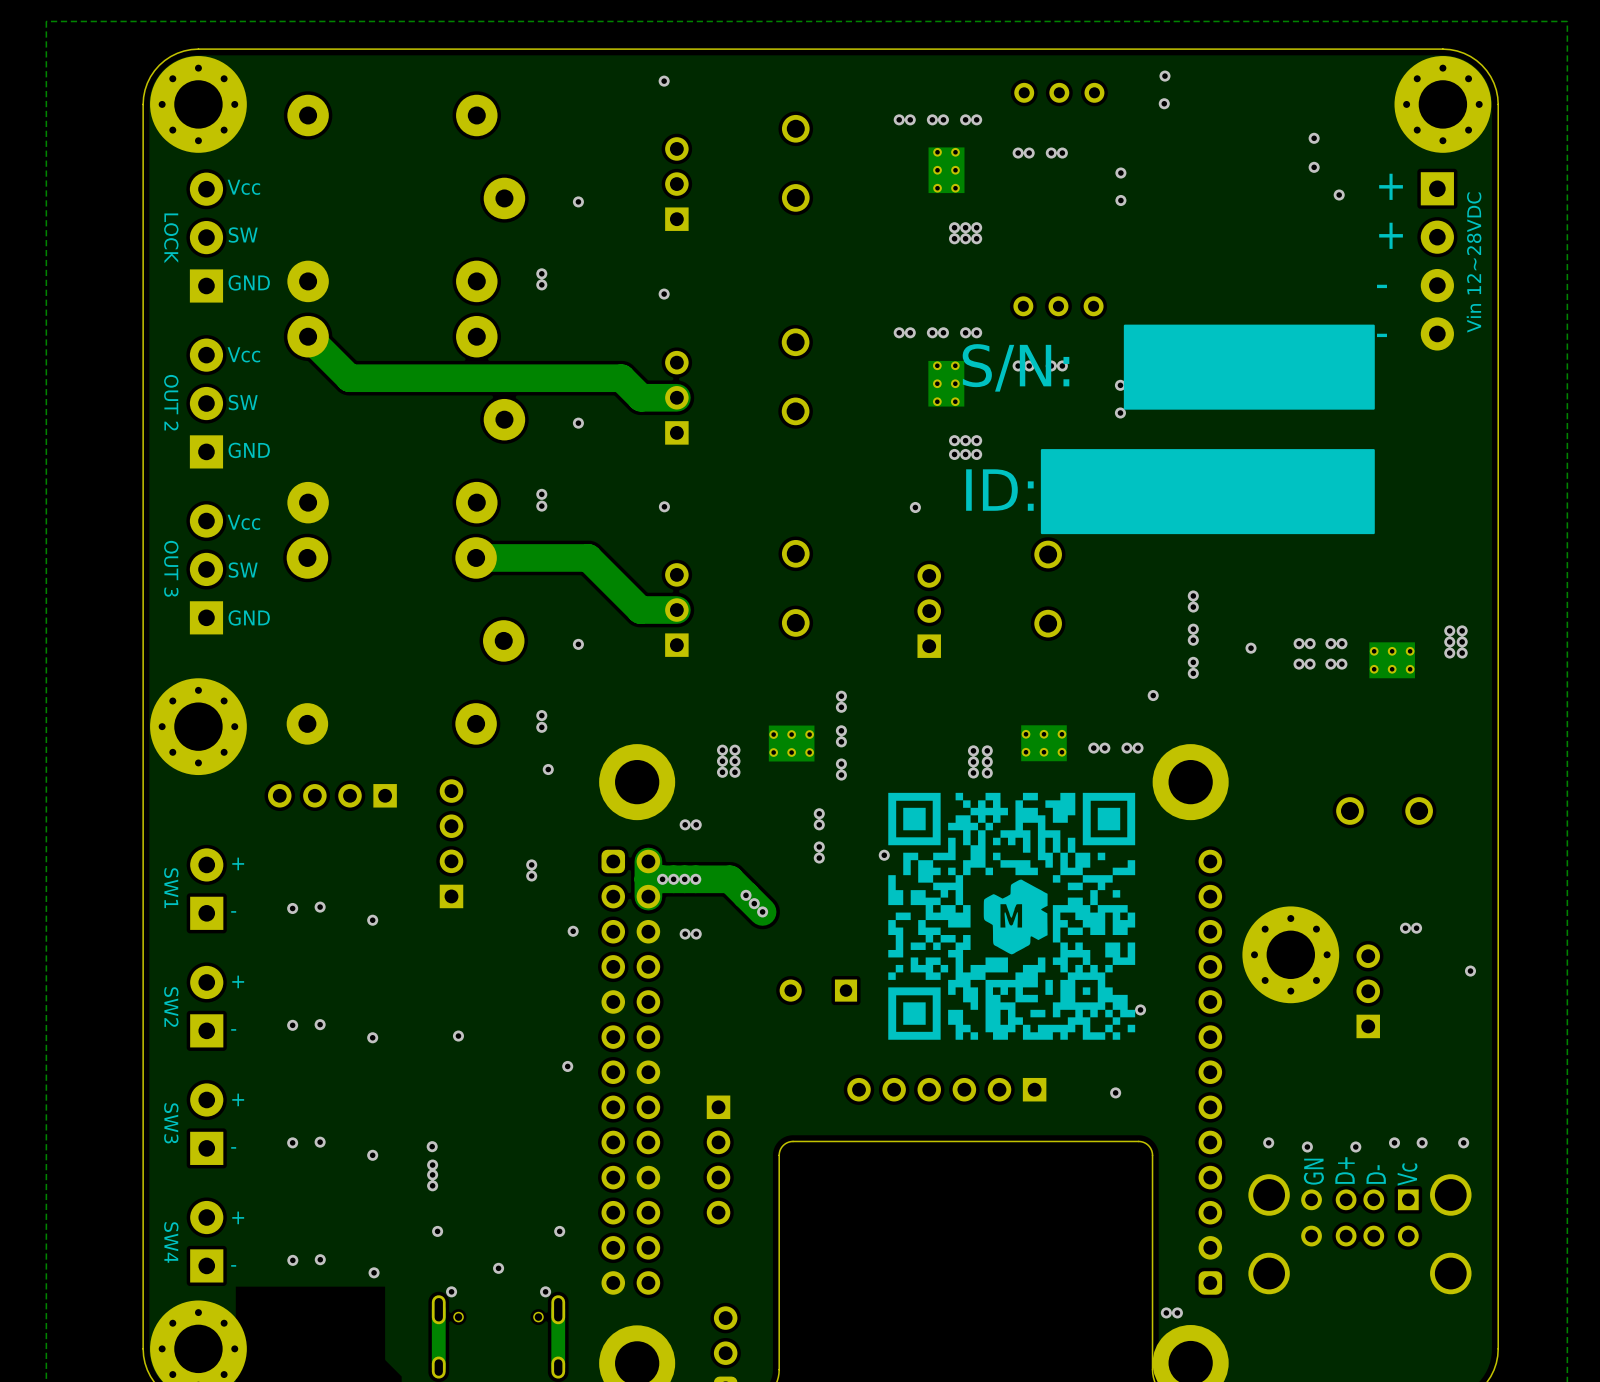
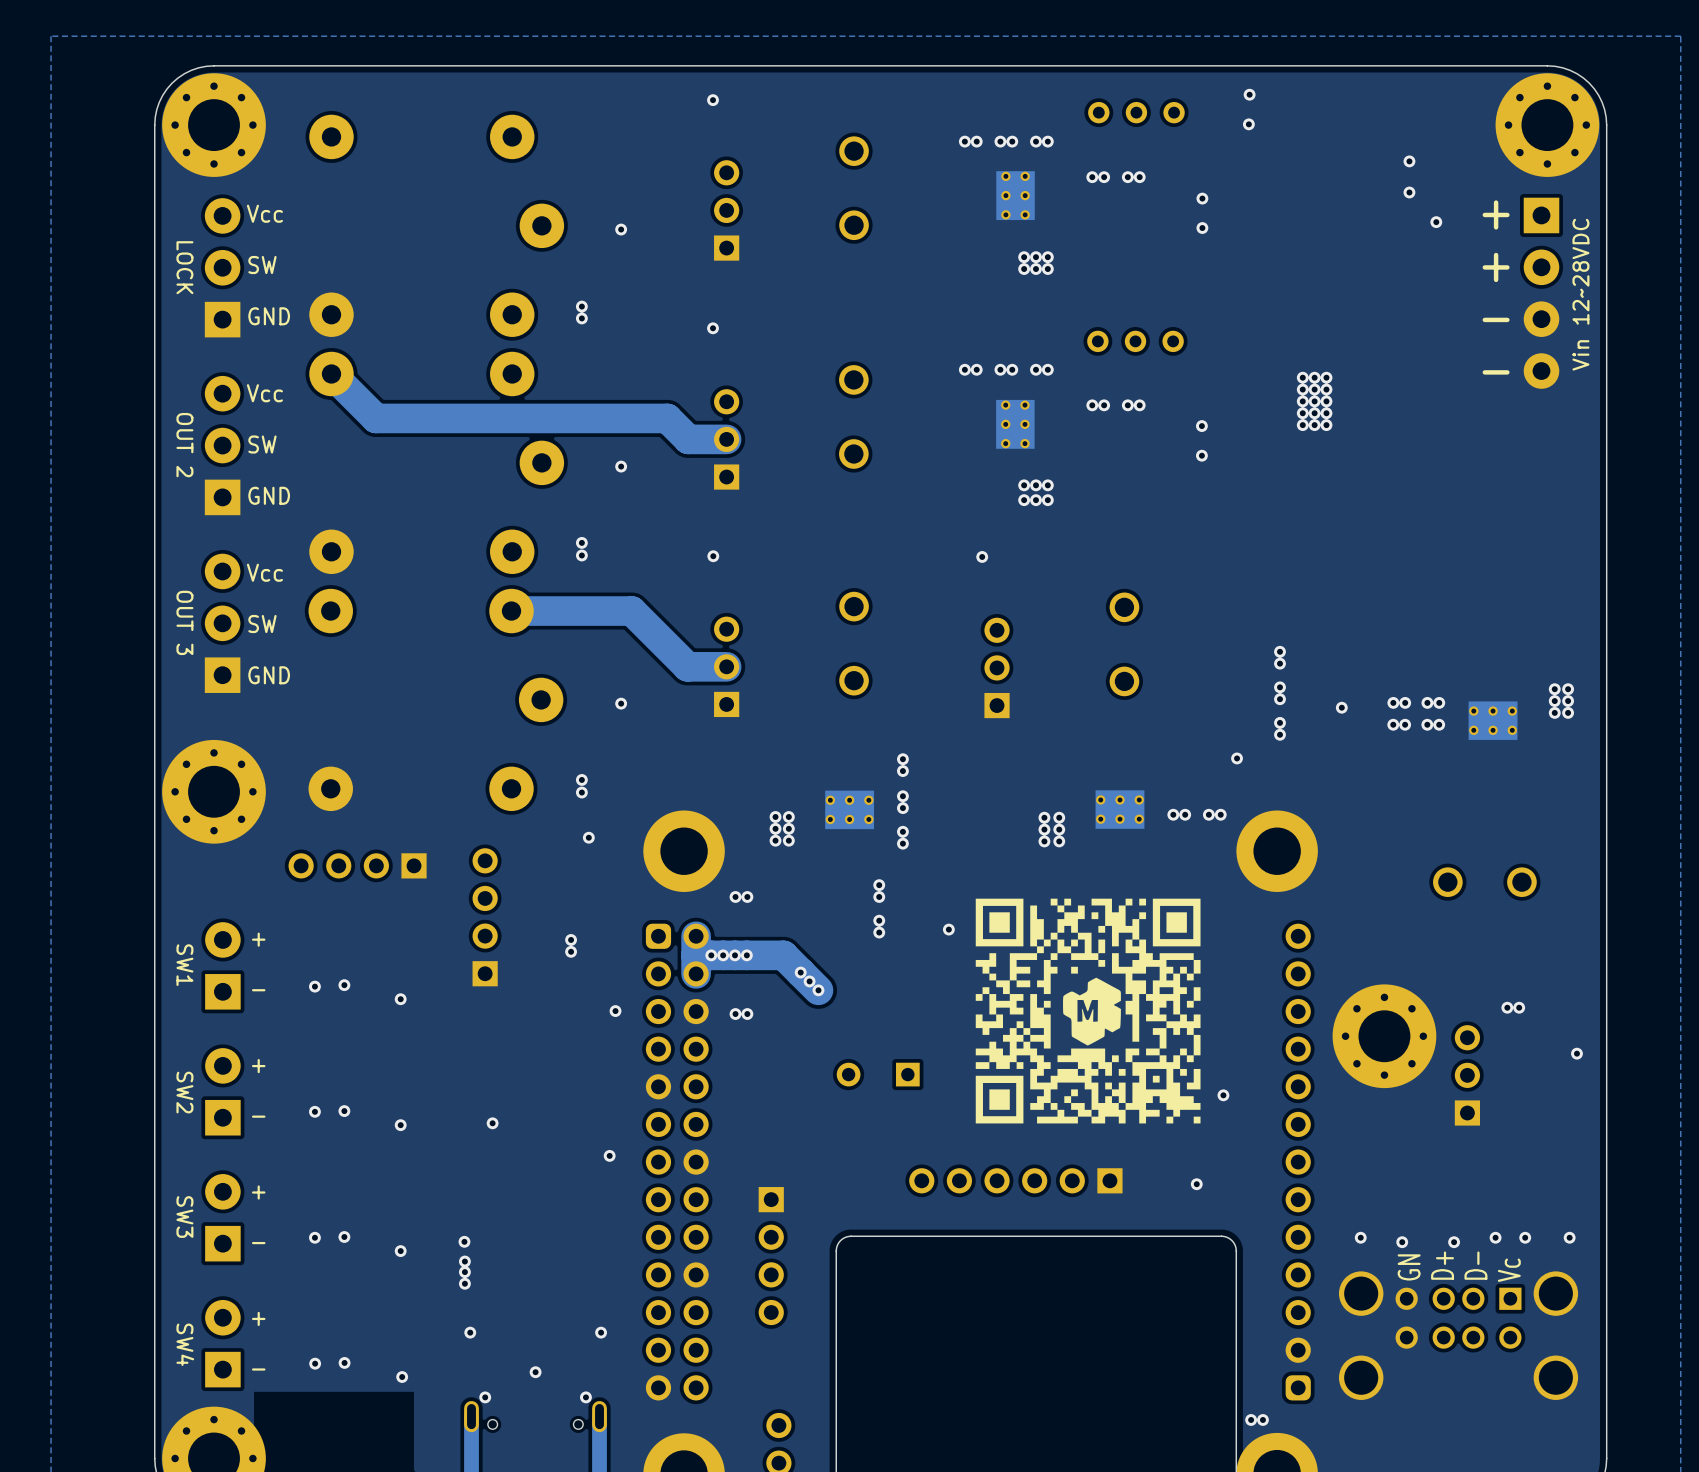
drawing: [1123, 324, 1375, 410] -> none
text: S/N: (1016, 367) -> none
drawing: [1040, 449, 1375, 535] -> none
text: ID: (999, 490) -> none
drawing: [888, 792, 1136, 1040] -> none
drawing: none -> [975, 898, 1201, 1124]

